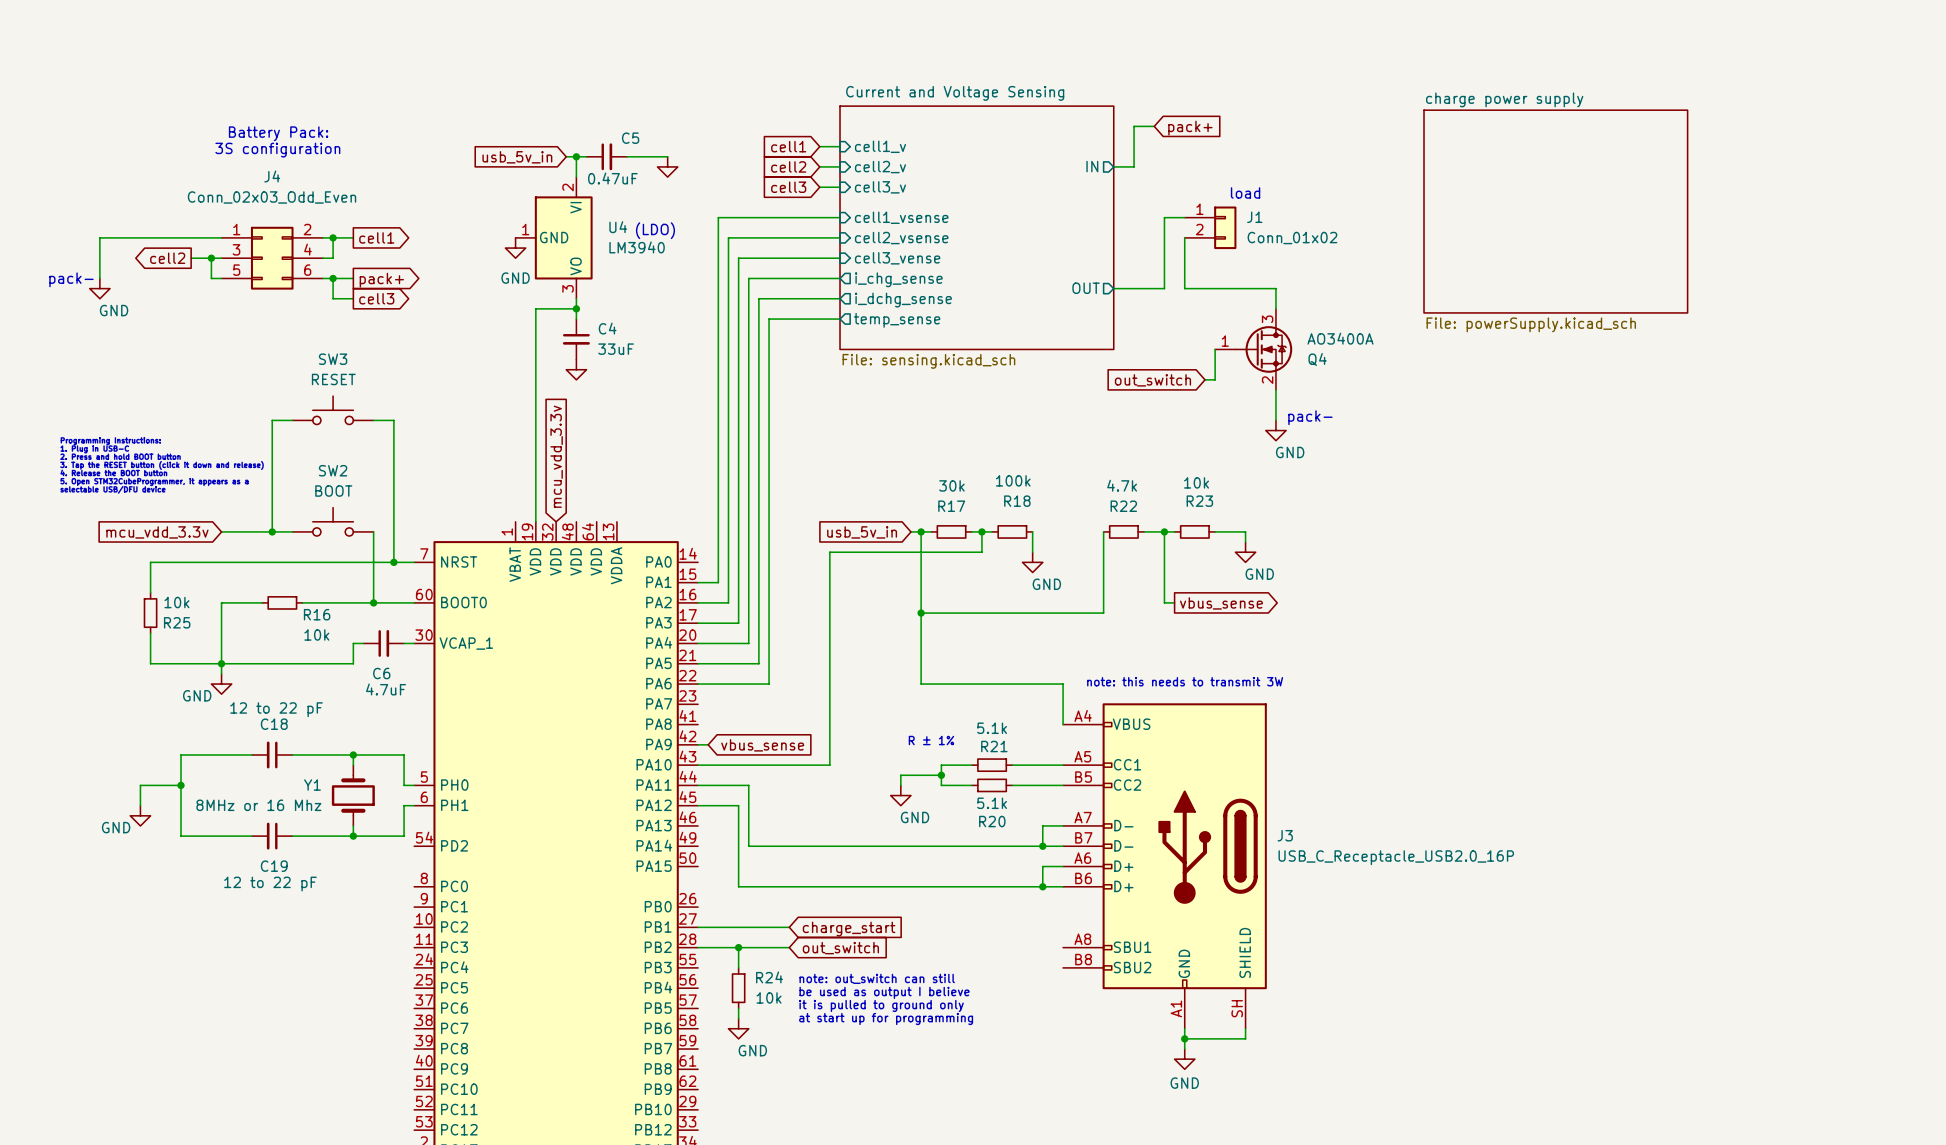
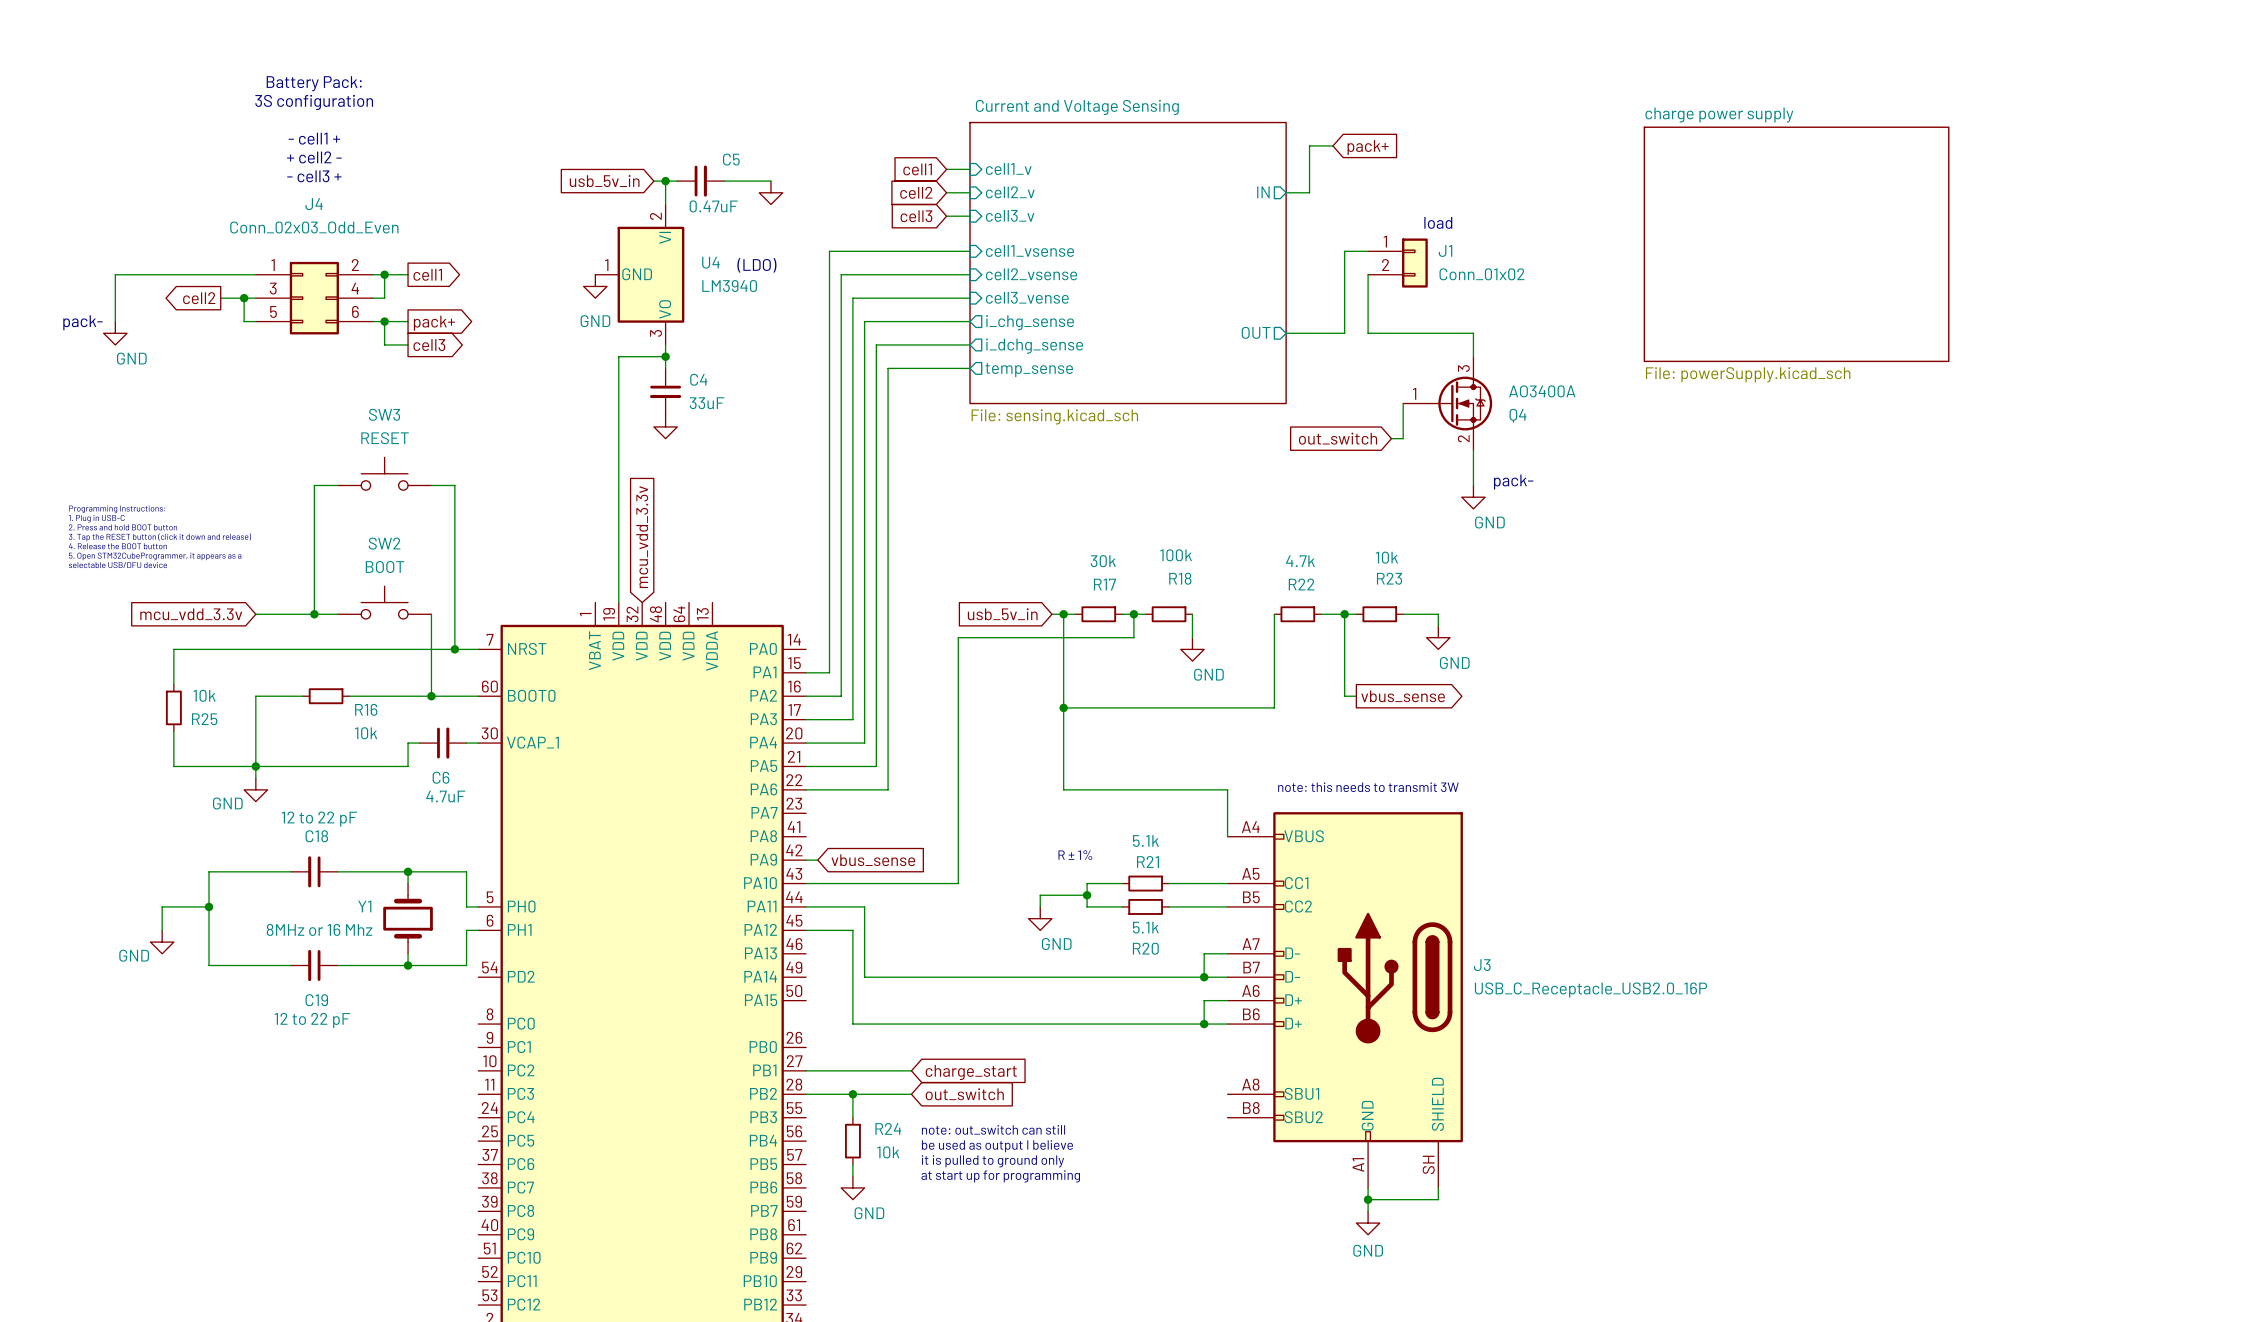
text: none -> - cell1 + (314, 138)
text position: Battery Pack: (278, 133) -> Battery Pack: (314, 83)
text: none -> + cell2 - (314, 157)
text position: 3S configuration (277, 150) -> 3S configuration (314, 102)
text: none -> - cell3 + (314, 176)

